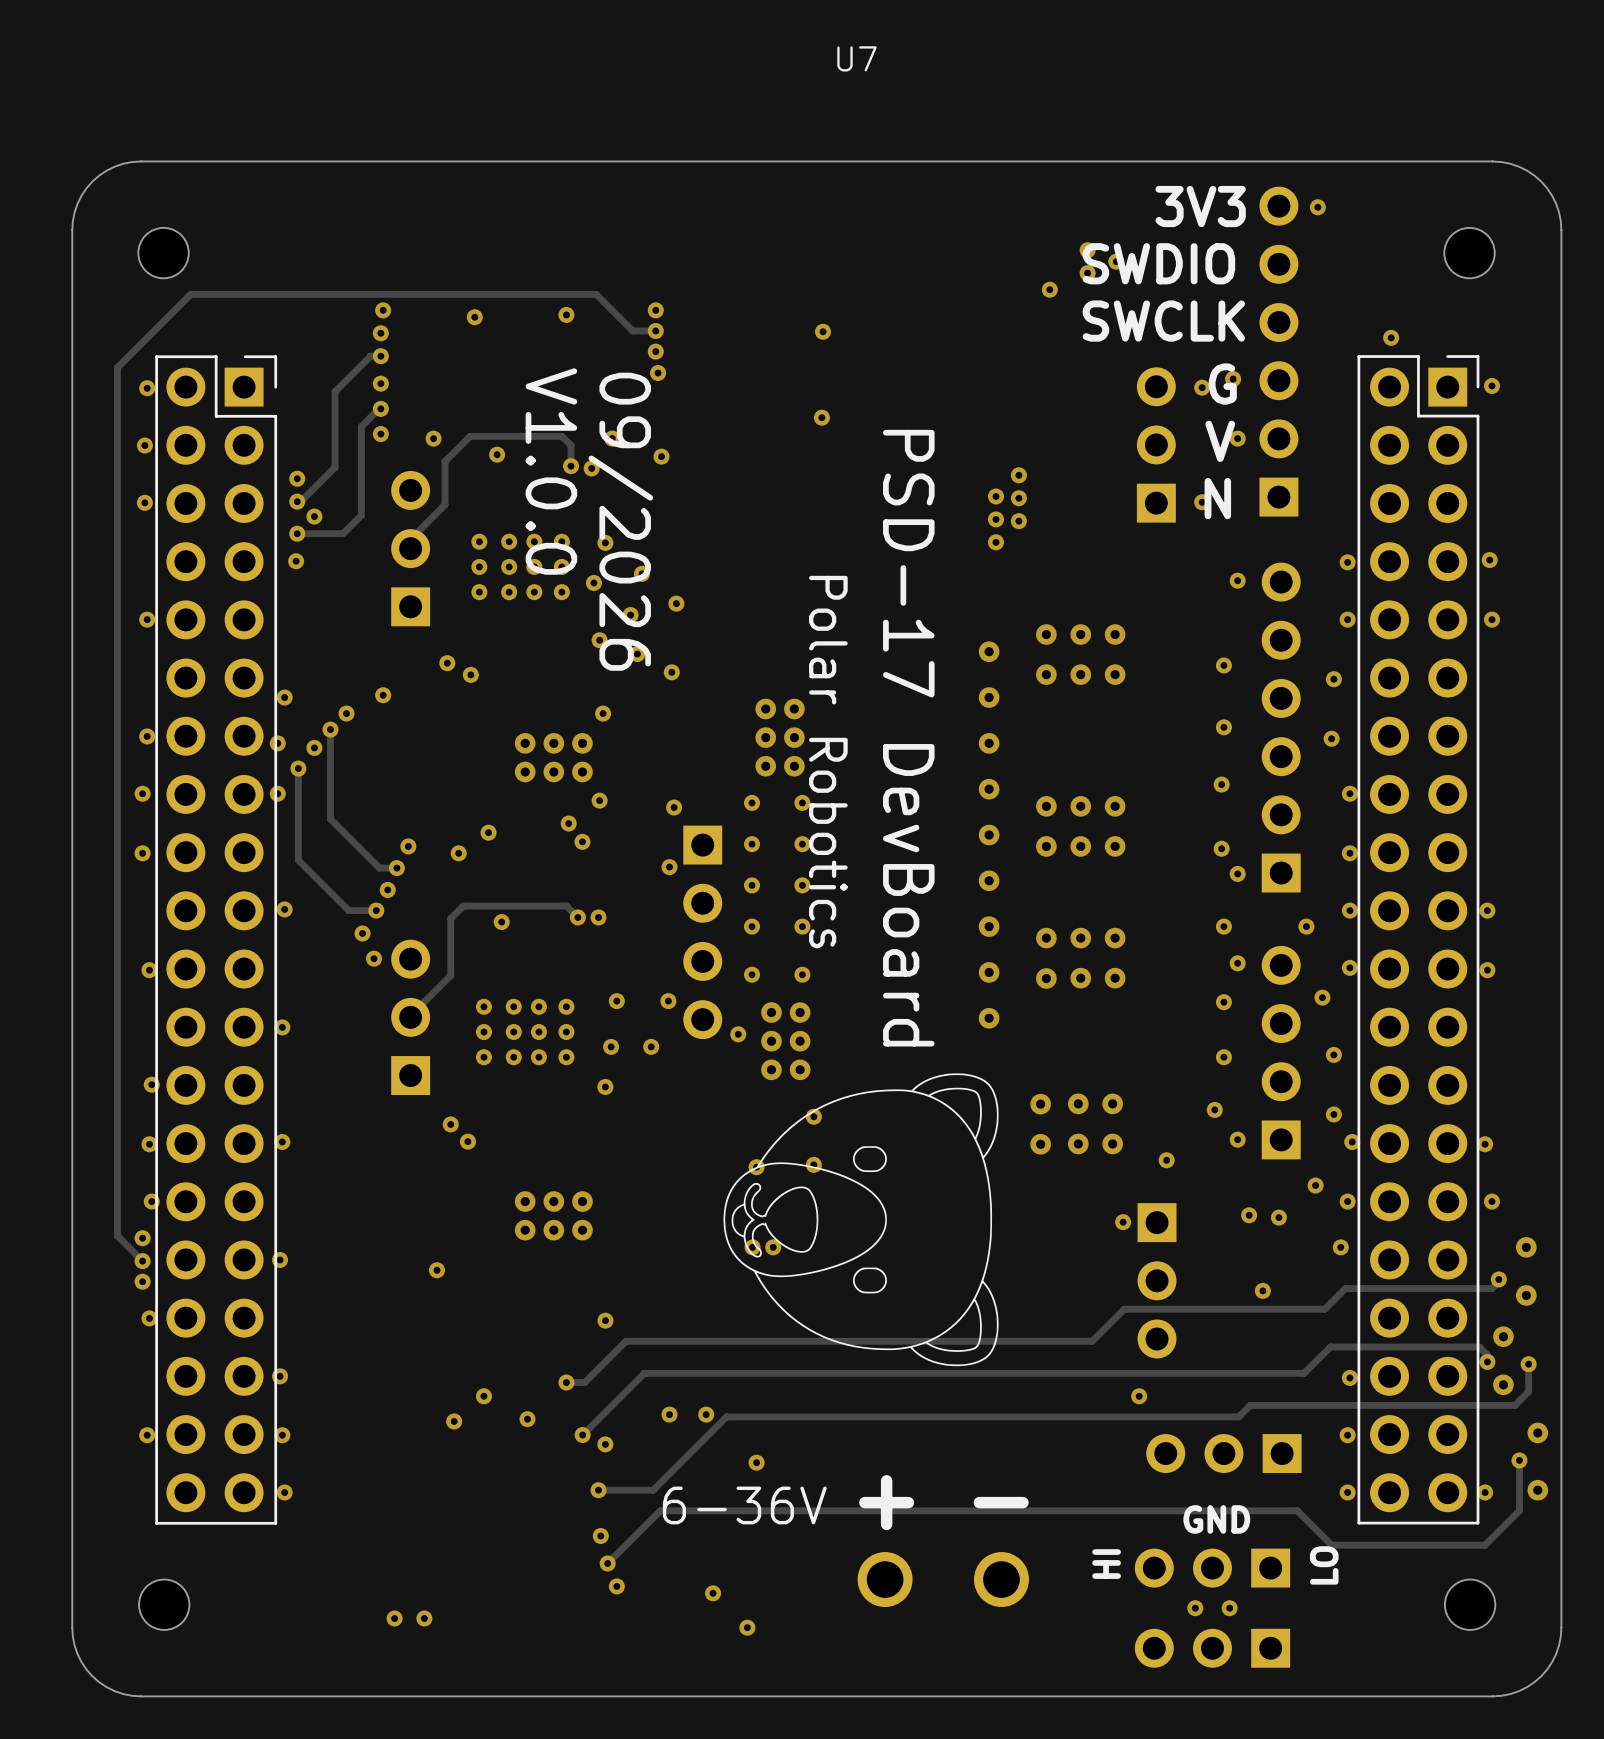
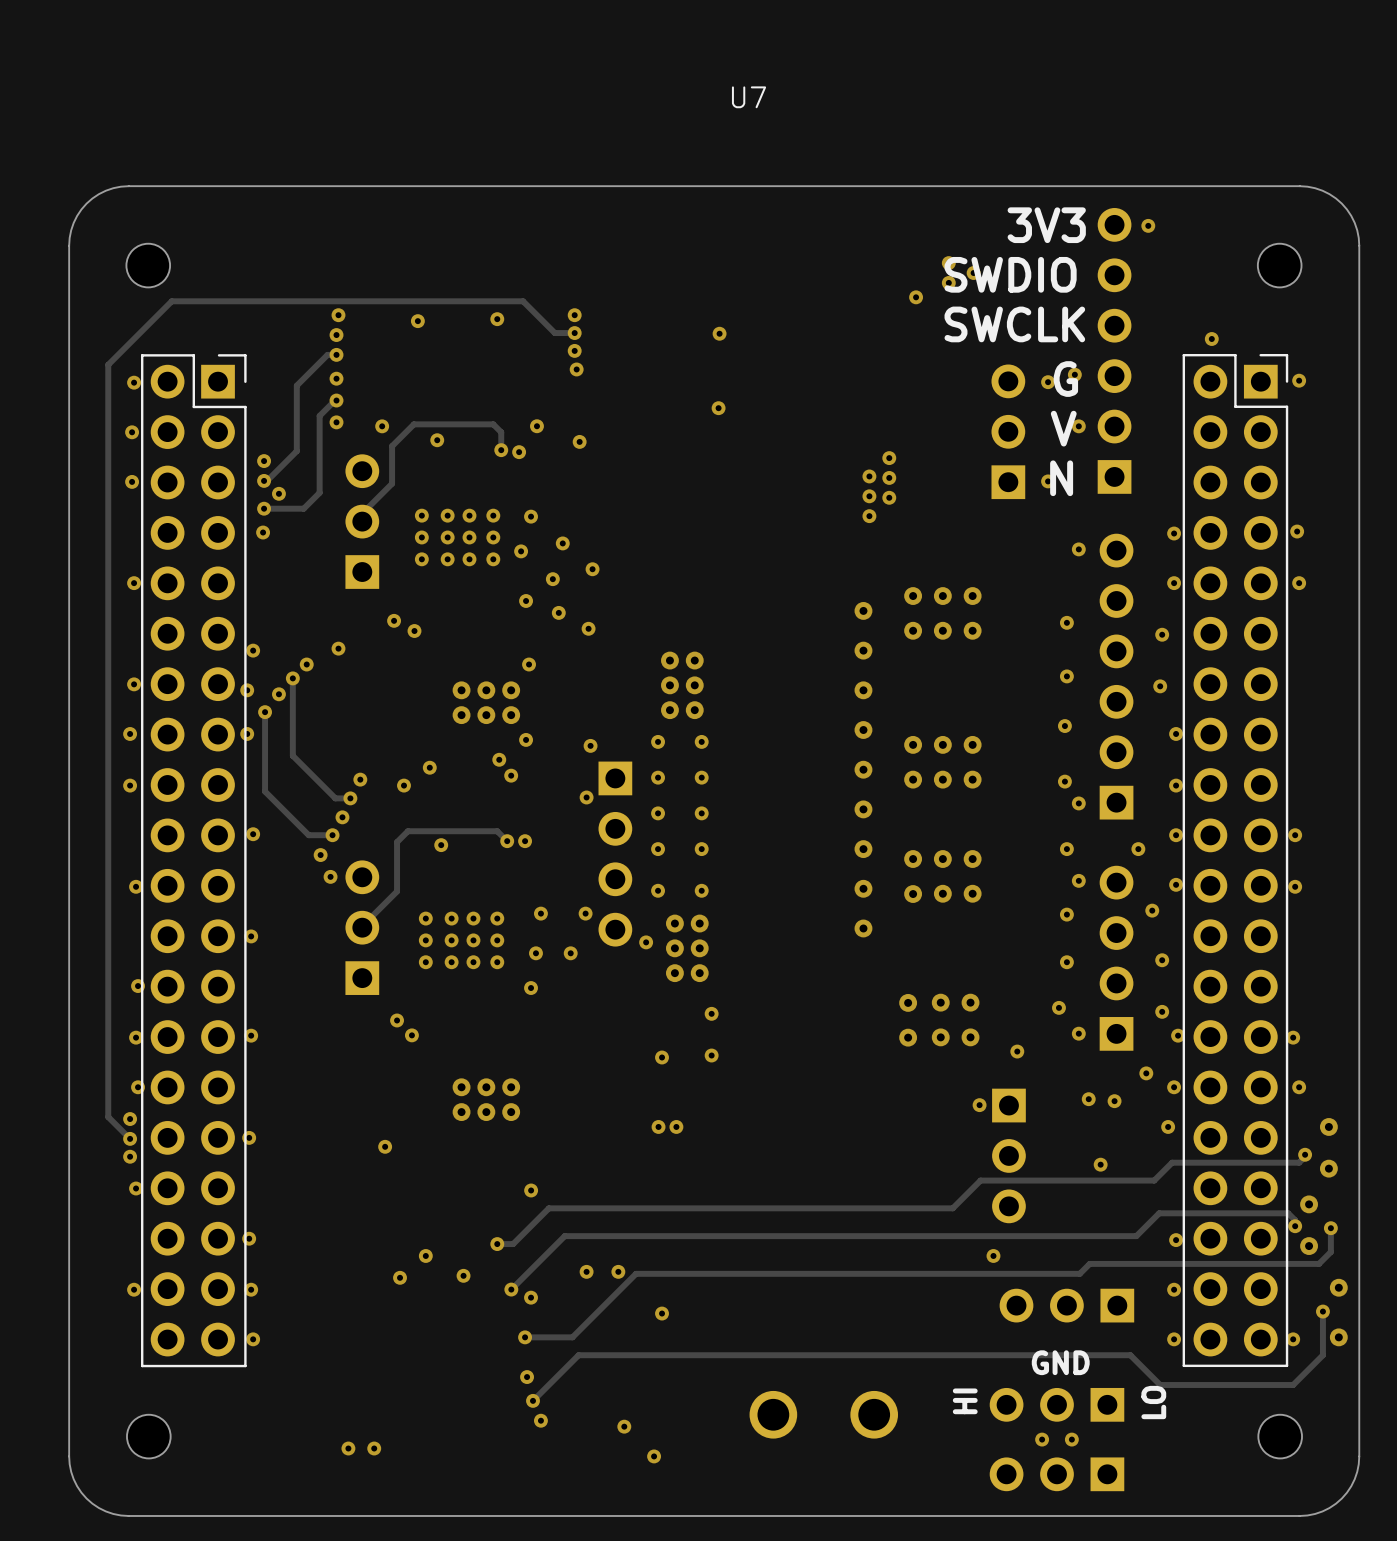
text: V1.0.0 (551, 471) -> none
text: 09/2026 (620, 521) -> none
text: PSD-17 DevBoard (908, 738) -> none
text: Polar Robotics (828, 762) -> none
drawing: [723, 1073, 999, 1367] -> none
text: + - (943, 1502) -> none
text: 6-36V (744, 1505) -> none

